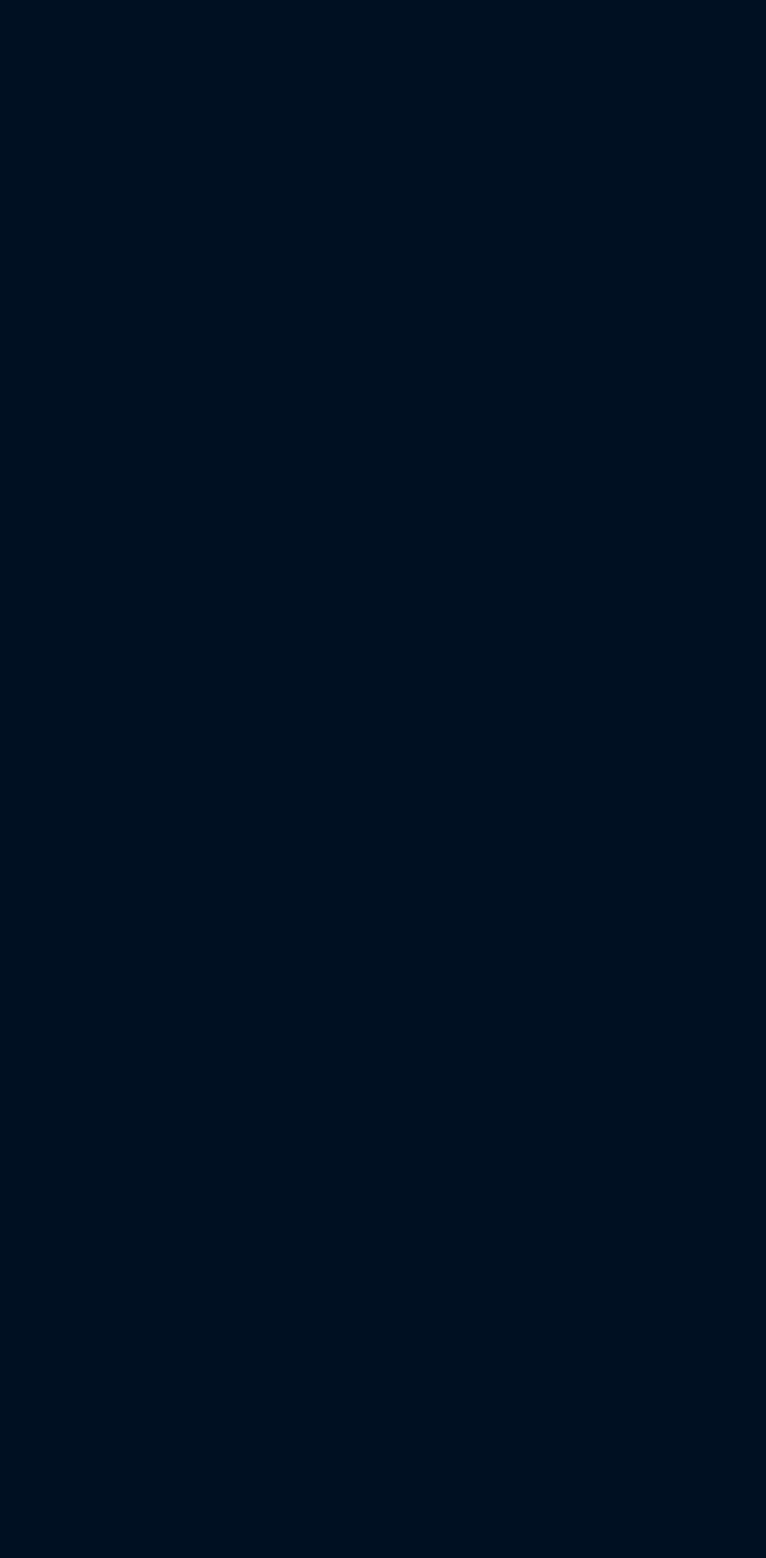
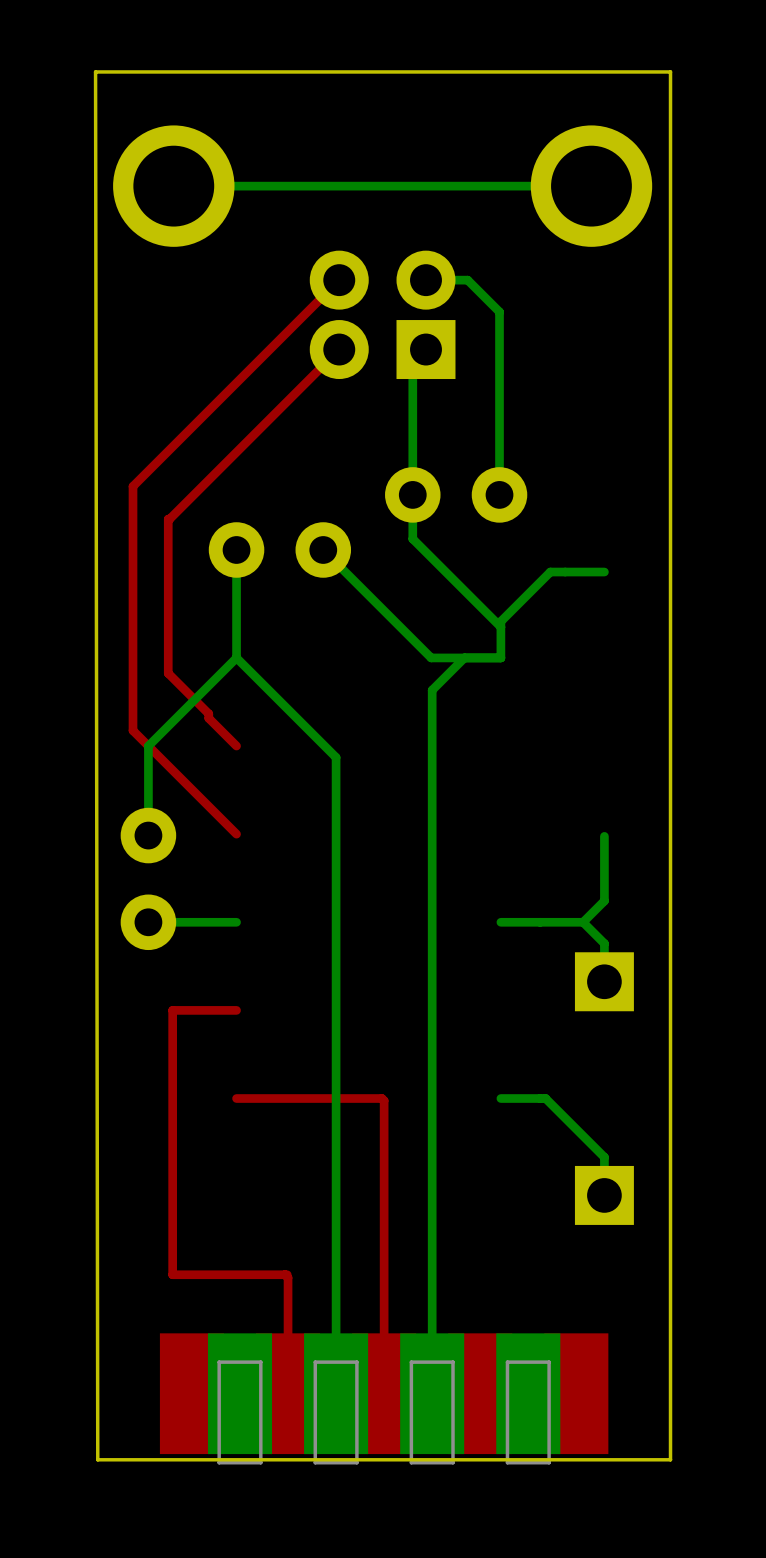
board edge: none -> (670, 71) (95, 71) (97, 1459) (670, 1459) (670, 71)
bottom track: none -> (591, 186) (173, 186)
part: none -> (382, 252)
top track: none -> (339, 280) (133, 486) (133, 730) (236, 834)
bottom track: none -> (425, 280) (467, 280) (499, 311) (499, 494)
top track: none -> (339, 349) (168, 519) (168, 673) (208, 713) (208, 718) (236, 746)
bottom track: none -> (425, 349) (412, 362) (412, 538) (500, 627)
part: none -> (456, 494)
bottom track: none -> (236, 549) (236, 657)
part: none -> (279, 549)
bottom track: none -> (323, 549) (431, 657) (500, 657) (500, 621) (550, 572) (604, 572)
bottom track: none -> (236, 657) (336, 757) (336, 1393)
bottom track: none -> (236, 657) (148, 746) (148, 835)
bottom track: none -> (464, 657) (432, 690) (432, 1393)
bottom track: none -> (604, 836) (604, 900) (583, 922)
part: none -> (148, 878)
bottom track: none -> (236, 922) (148, 922)
bottom track: none -> (583, 922) (500, 922)
bottom track: none -> (583, 922) (604, 943) (604, 981)
part: none -> (604, 981)
top track: none -> (236, 1010) (172, 1010) (172, 1274) (287, 1274)
top track: none -> (236, 1098) (381, 1098) (384, 1100) (384, 1393)
bottom track: none -> (500, 1098) (545, 1098) (604, 1157) (604, 1195)
part: none -> (604, 1195)
top track: none -> (285, 1274) (288, 1277) (288, 1393)
part: none -> (384, 1398)

